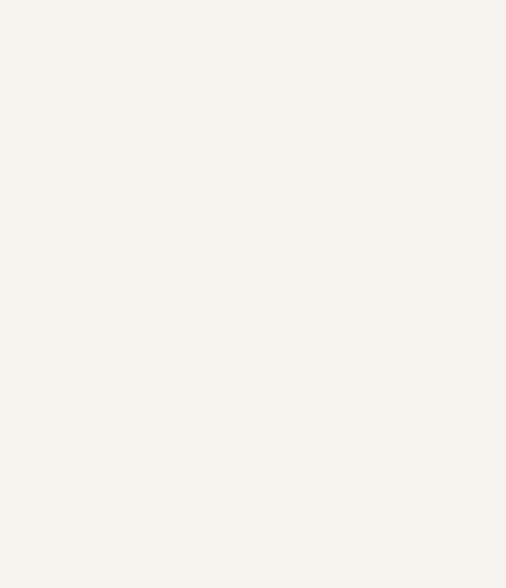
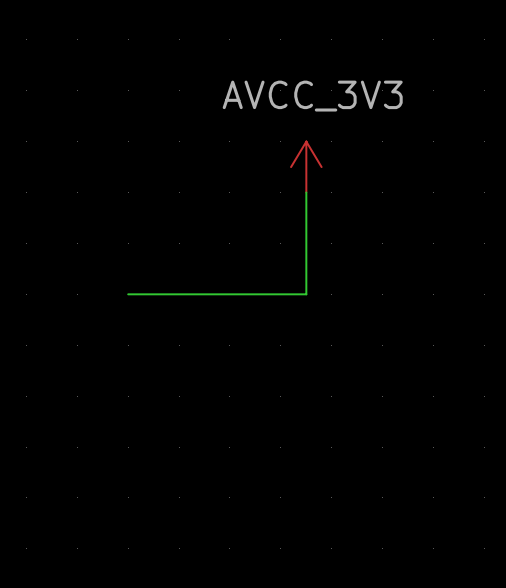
power symbol: none -> AVCC_3V3 (306, 167)
wire: none -> (306, 192) (306, 294) (128, 294)

